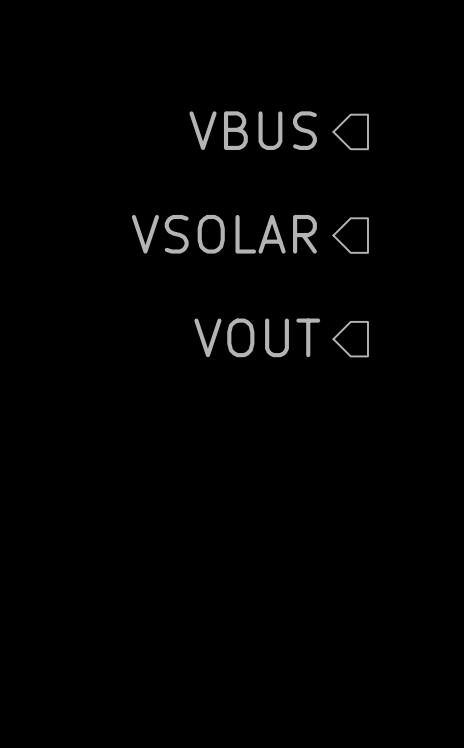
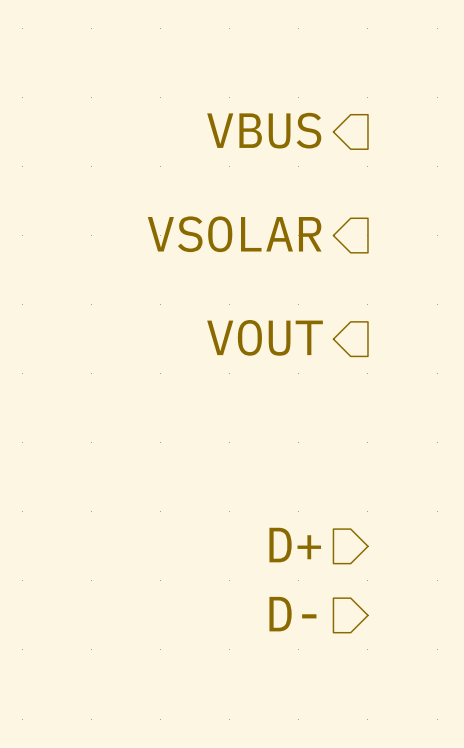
hierarchical label: none -> D+ (295, 545)
hierarchical label: none -> D- (292, 614)

